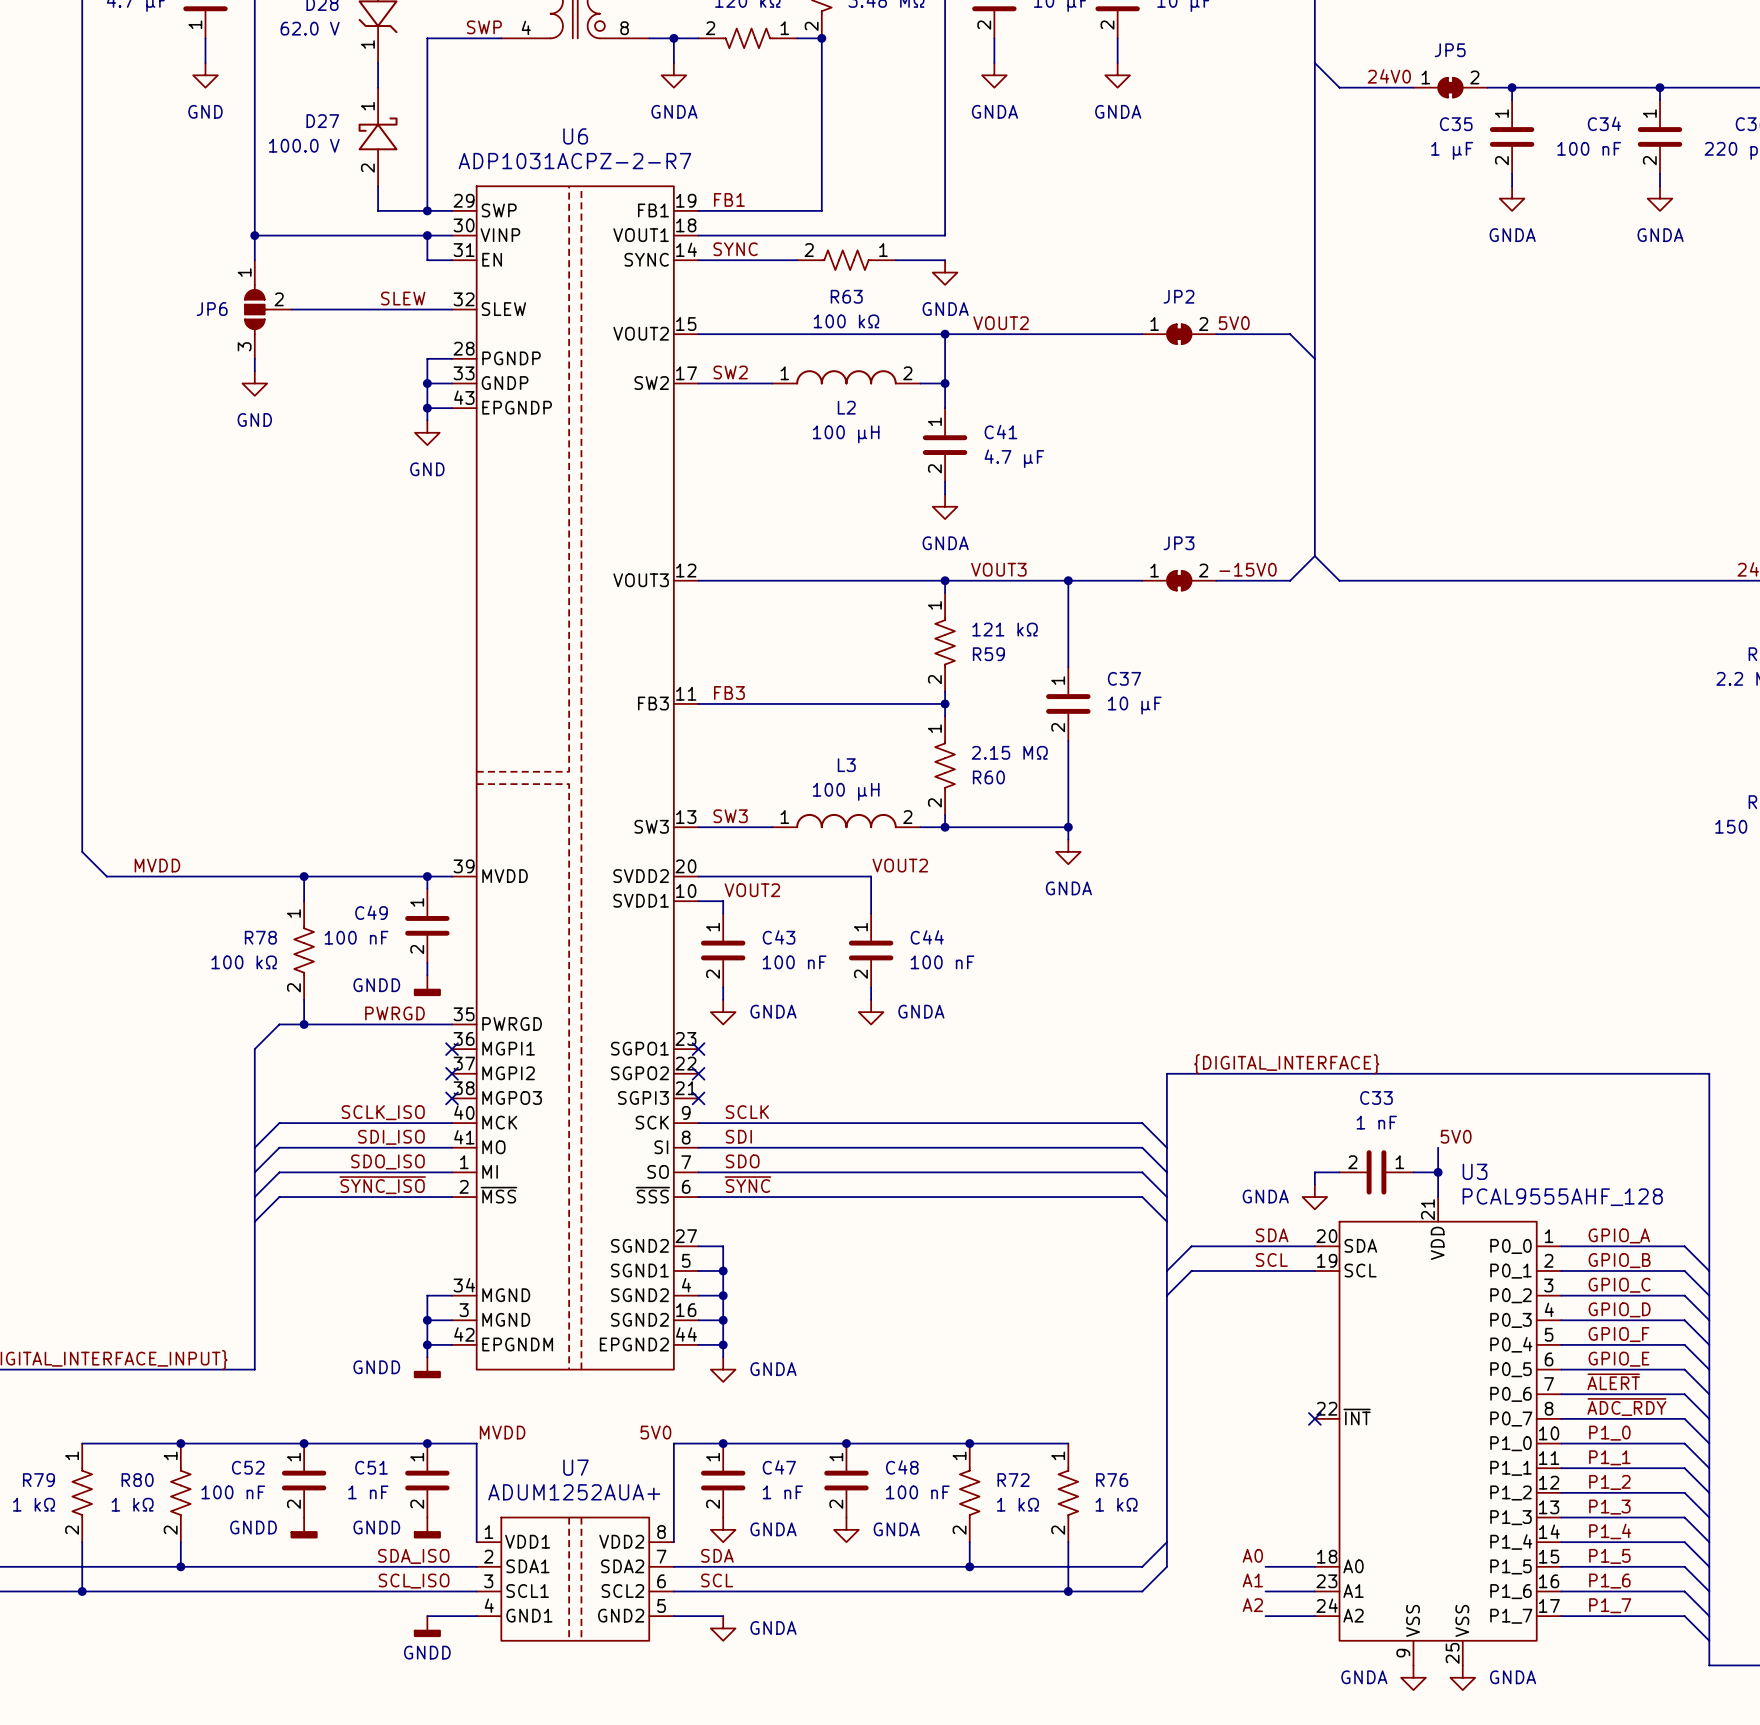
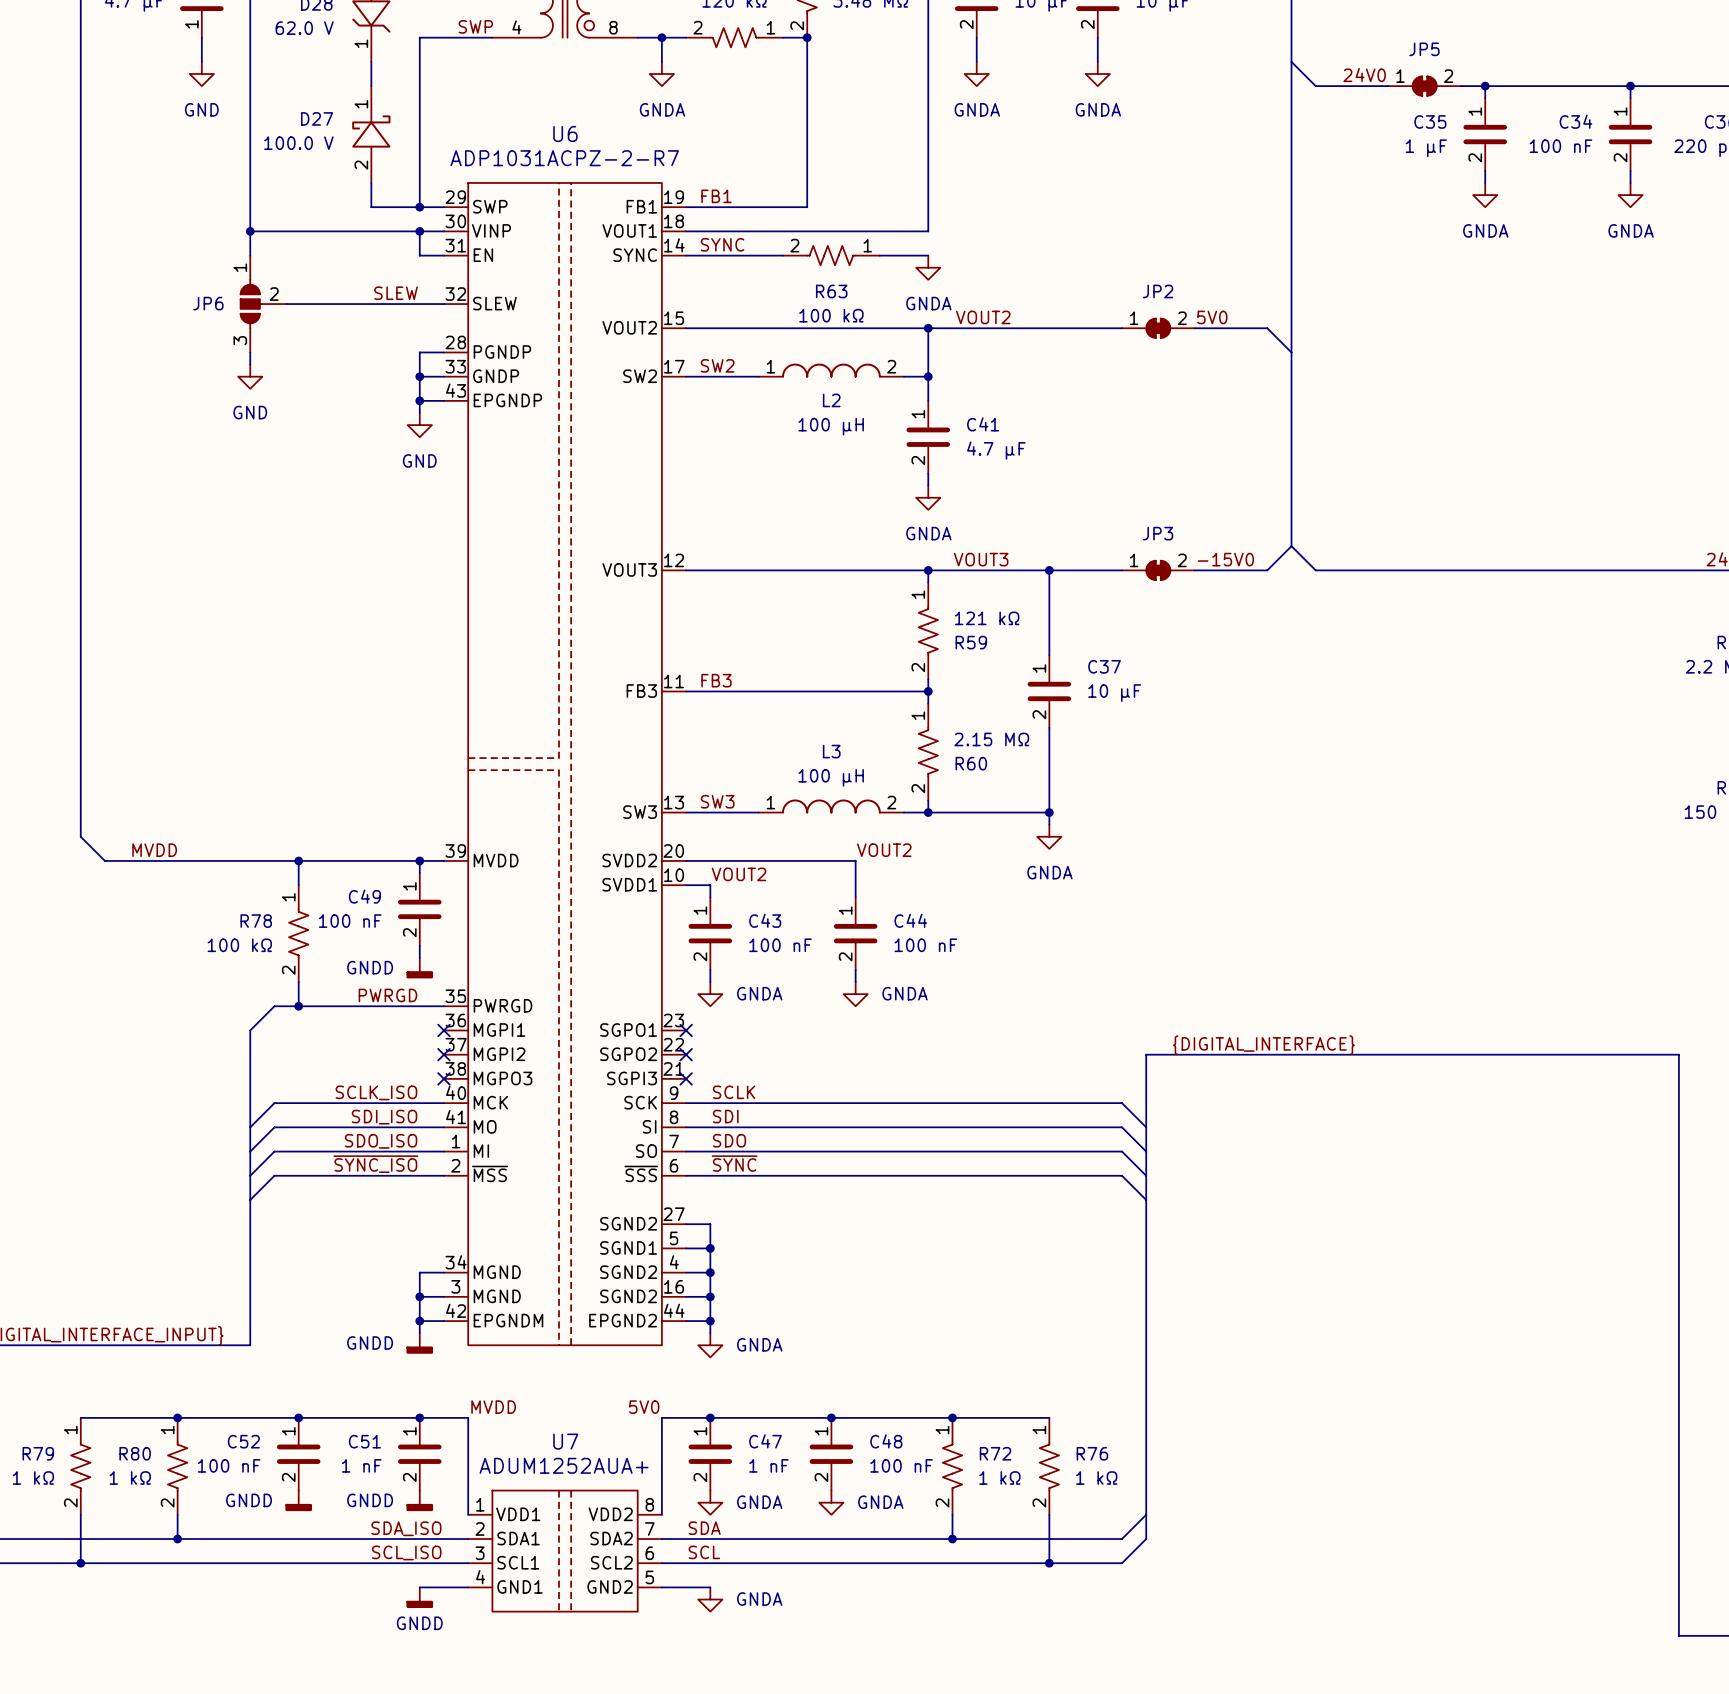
label: 5V0 (1456, 1136) -> none
wire: (1438, 1147) (1438, 1197) -> none
wire: (1339, 1172) (1314, 1172) (1314, 1184) -> none
C33: 1 nF (1376, 1172) -> none
wire: (1413, 1172) (1438, 1172) -> none
junction: (1438, 1172) -> none
power symbol: GNDA (1314, 1197) -> none
label: SDA (1272, 1235) -> none
label: GPIO_A (1619, 1235) -> none
wire: (1314, 1246) (1191, 1246) (1166, 1270) -> none
wire: (1561, 1246) (1684, 1246) (1709, 1270) -> none
label: SCL (1271, 1259) -> none
label: GPIO_B (1619, 1260) -> none
wire: (1314, 1270) (1191, 1270) (1166, 1295) -> none
wire: (1561, 1270) (1684, 1270) (1709, 1295) -> none
label: GPIO_C (1619, 1285) -> none
wire: (1561, 1295) (1684, 1295) (1709, 1320) -> none
label: GPIO_D (1619, 1309) -> none
wire: (1561, 1320) (1684, 1320) (1709, 1344) -> none
label: GPIO_F (1619, 1334) -> none
wire: (1561, 1344) (1684, 1344) (1709, 1369) -> none
label: GPIO_E (1619, 1359) -> none
wire: (1561, 1369) (1684, 1369) (1709, 1394) -> none
label: ~{ALERT} (1613, 1381) -> none
wire: (1561, 1394) (1684, 1394) (1709, 1418) -> none
label: ~{ADC_RDY} (1626, 1407) -> none
no-connect mark: (1314, 1418) -> none
wire: (1561, 1418) (1684, 1418) (1709, 1443) -> none
U3: PCAL9555AHF_128 (1438, 1431) -> none
label: P1_0 (1609, 1433) -> none
wire: (1561, 1443) (1684, 1443) (1709, 1468) -> none
label: P1_1 (1609, 1457) -> none
wire: (1561, 1468) (1684, 1468) (1709, 1492) -> none
label: P1_2 (1609, 1482) -> none
wire: (1561, 1492) (1684, 1492) (1709, 1517) -> none
label: P1_3 (1609, 1507) -> none
wire: (1561, 1517) (1684, 1517) (1709, 1542) -> none
label: P1_4 (1610, 1531) -> none
wire: (1561, 1542) (1684, 1542) (1709, 1566) -> none
label: A0 (1252, 1555) -> none
label: P1_5 (1609, 1556) -> none
wire: (1265, 1566) (1314, 1566) -> none
wire: (1561, 1566) (1684, 1566) (1709, 1591) -> none
label: A1 (1252, 1580) -> none
label: P1_6 (1609, 1581) -> none
wire: (1265, 1591) (1314, 1591) -> none
wire: (1561, 1591) (1684, 1591) (1709, 1616) -> none
label: A2 (1252, 1605) -> none
label: P1_7 (1610, 1605) -> none
wire: (1265, 1616) (1314, 1616) -> none
wire: (1561, 1616) (1684, 1616) (1709, 1640) -> none
power symbol: GNDA (1413, 1677) -> none
power symbol: GNDA (1462, 1677) -> none

